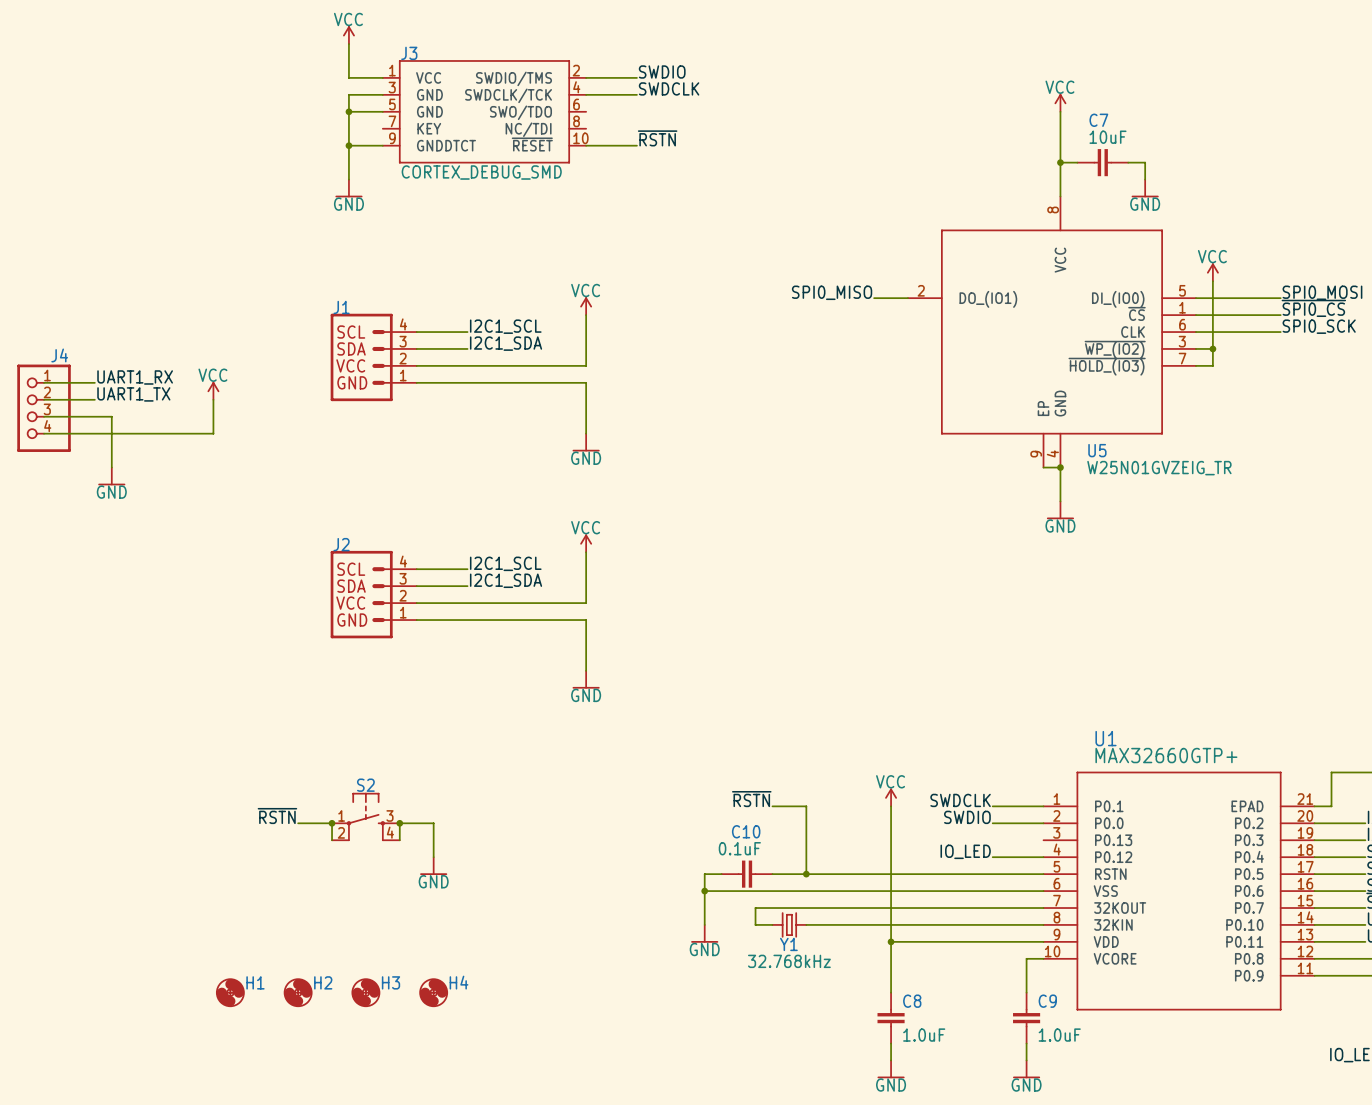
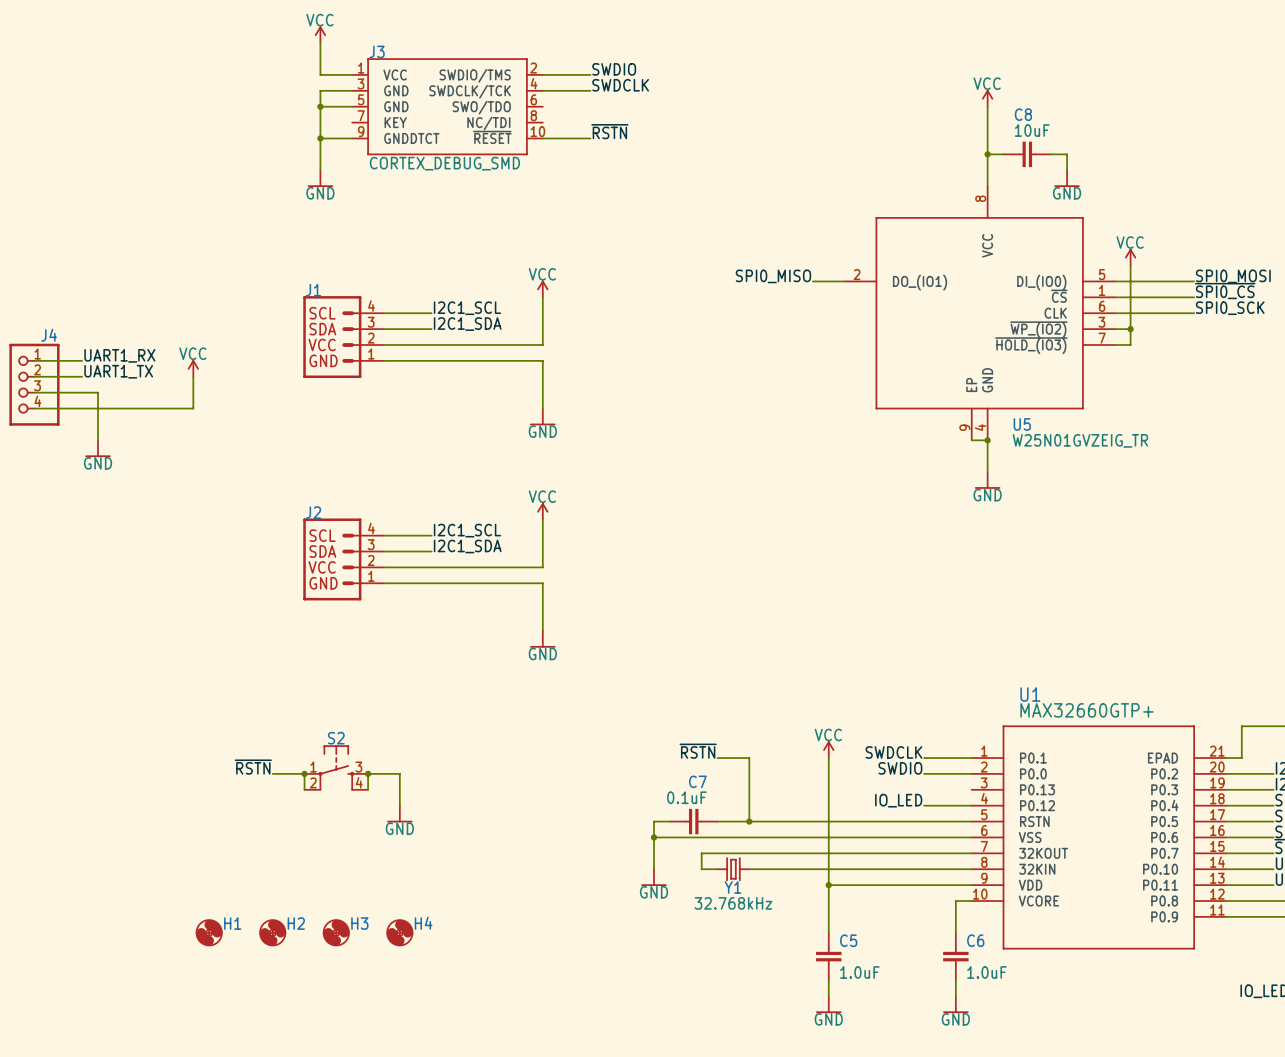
C7 name: C7 (1098, 120) -> C8 (1023, 114)
C10 name: C10 (746, 831) -> C7 (697, 781)
C8 name: C8 (912, 1001) -> C5 (848, 940)
C9 name: C9 (1047, 1001) -> C6 (975, 940)

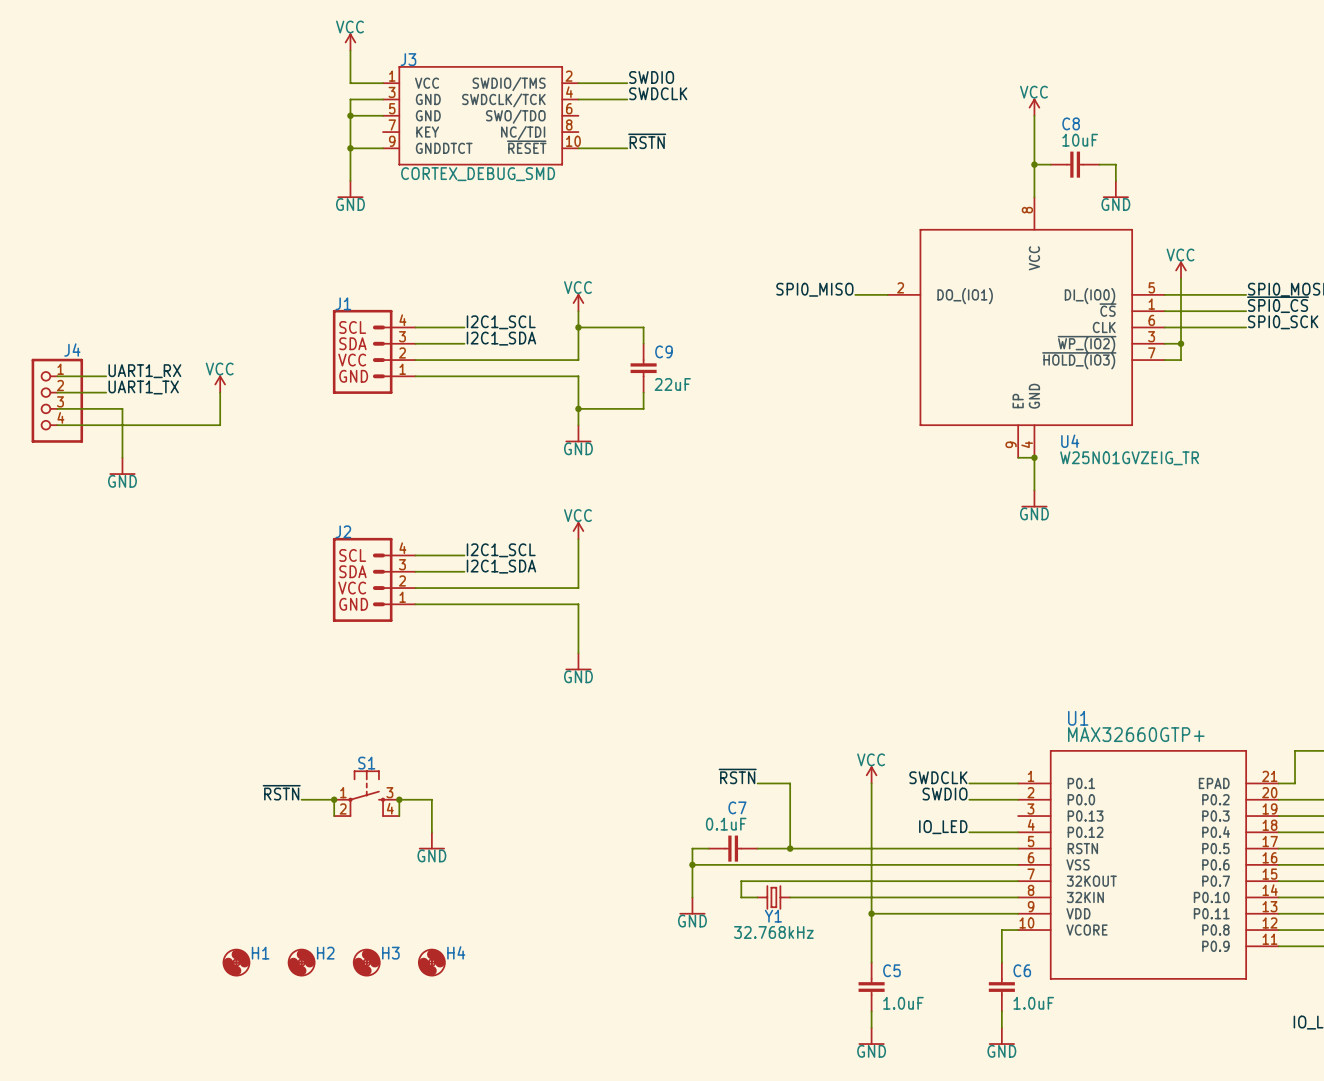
wire: none -> (578, 327) (643, 327) (643, 343)
junction: none -> (578, 327)
C9: none -> 22uF (643, 368)
wire: none -> (643, 392) (643, 408) (578, 408)
junction: none -> (578, 408)
U5 name: U5 (1022, 424) -> U4 (1070, 441)
S2 name: S2 (336, 738) -> S1 (366, 763)

